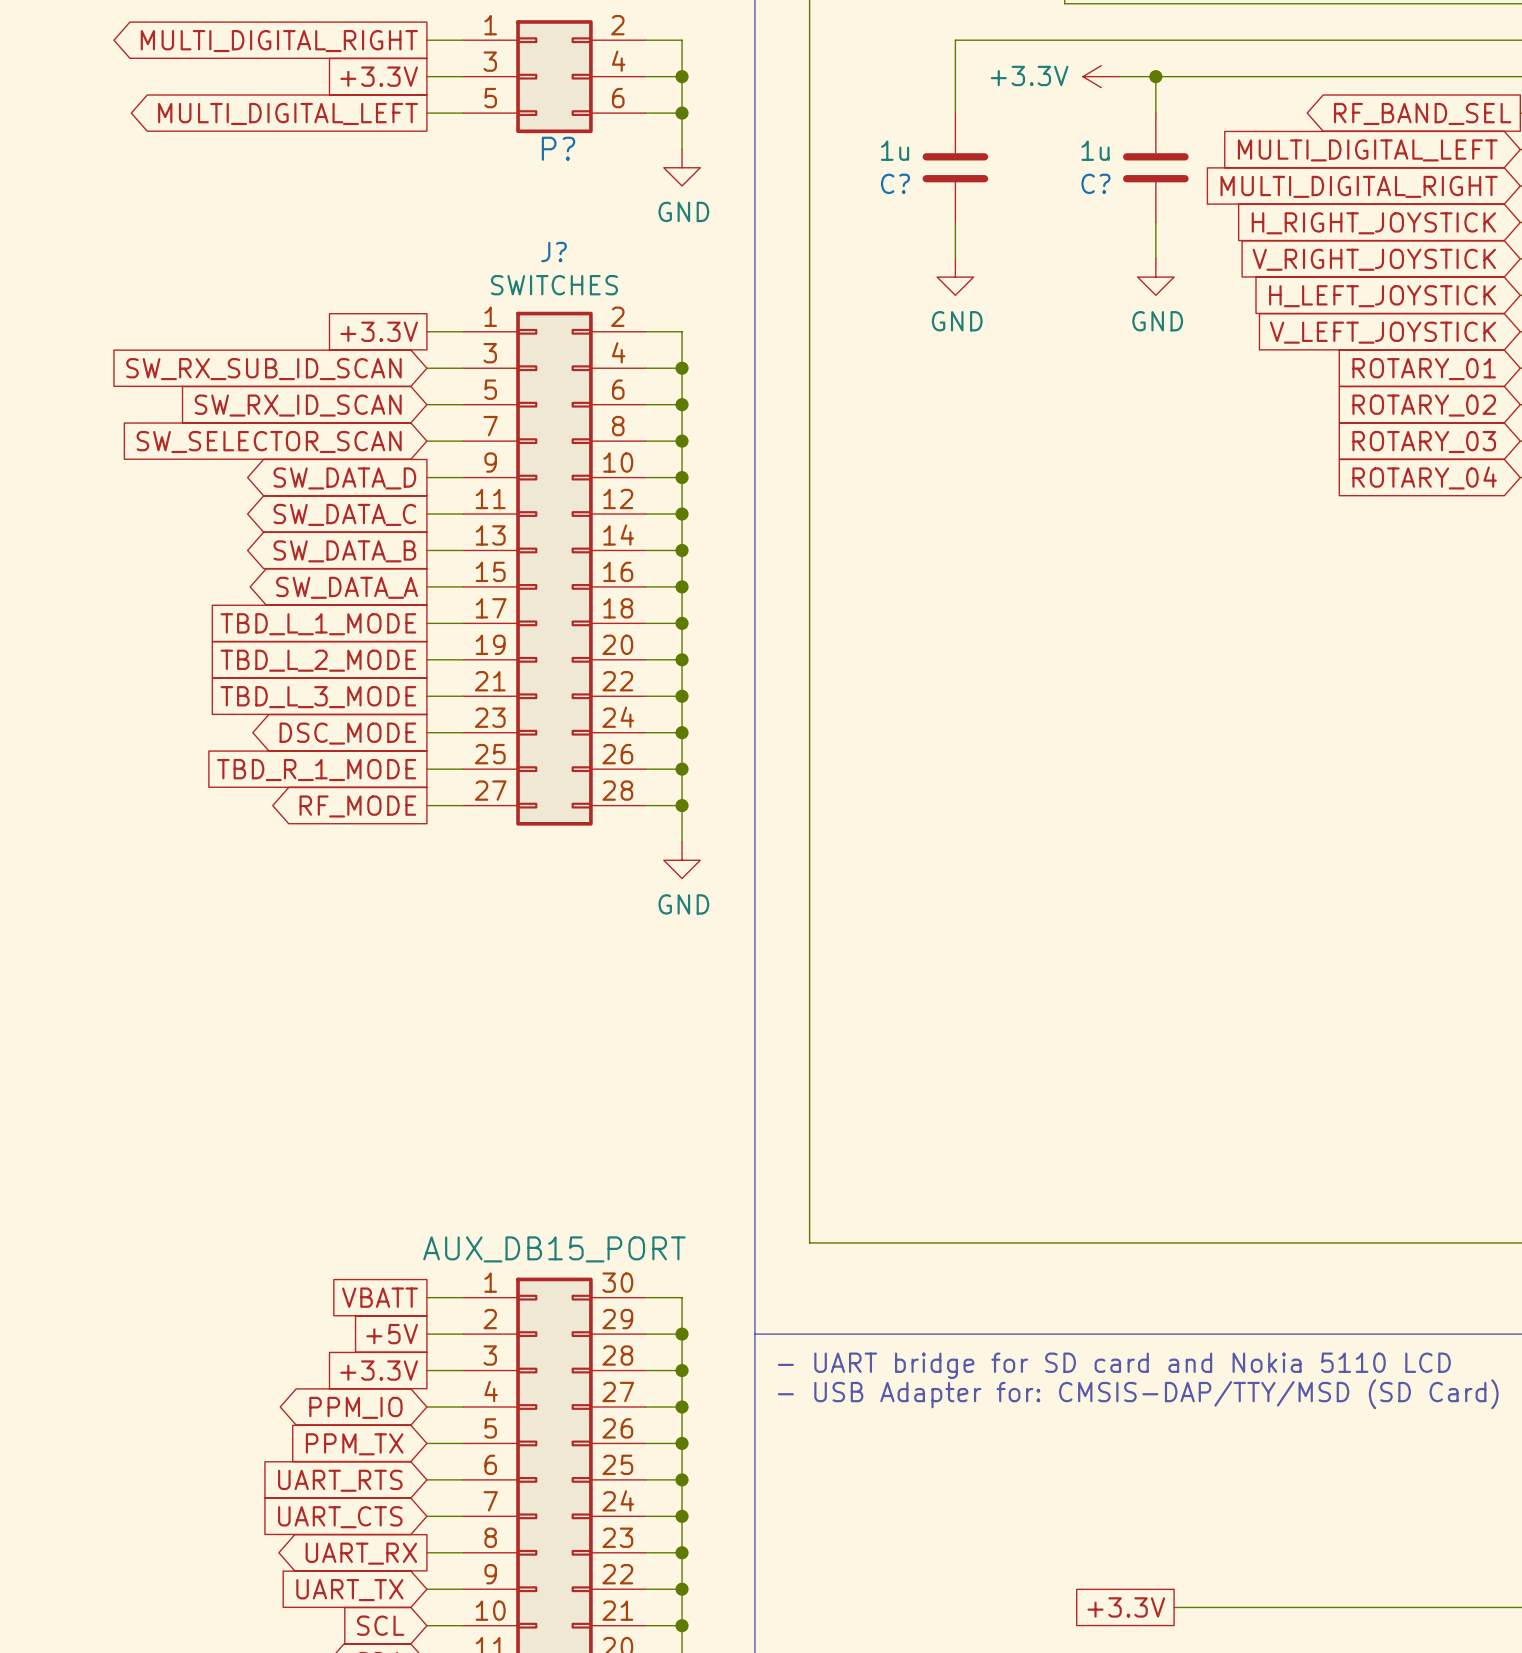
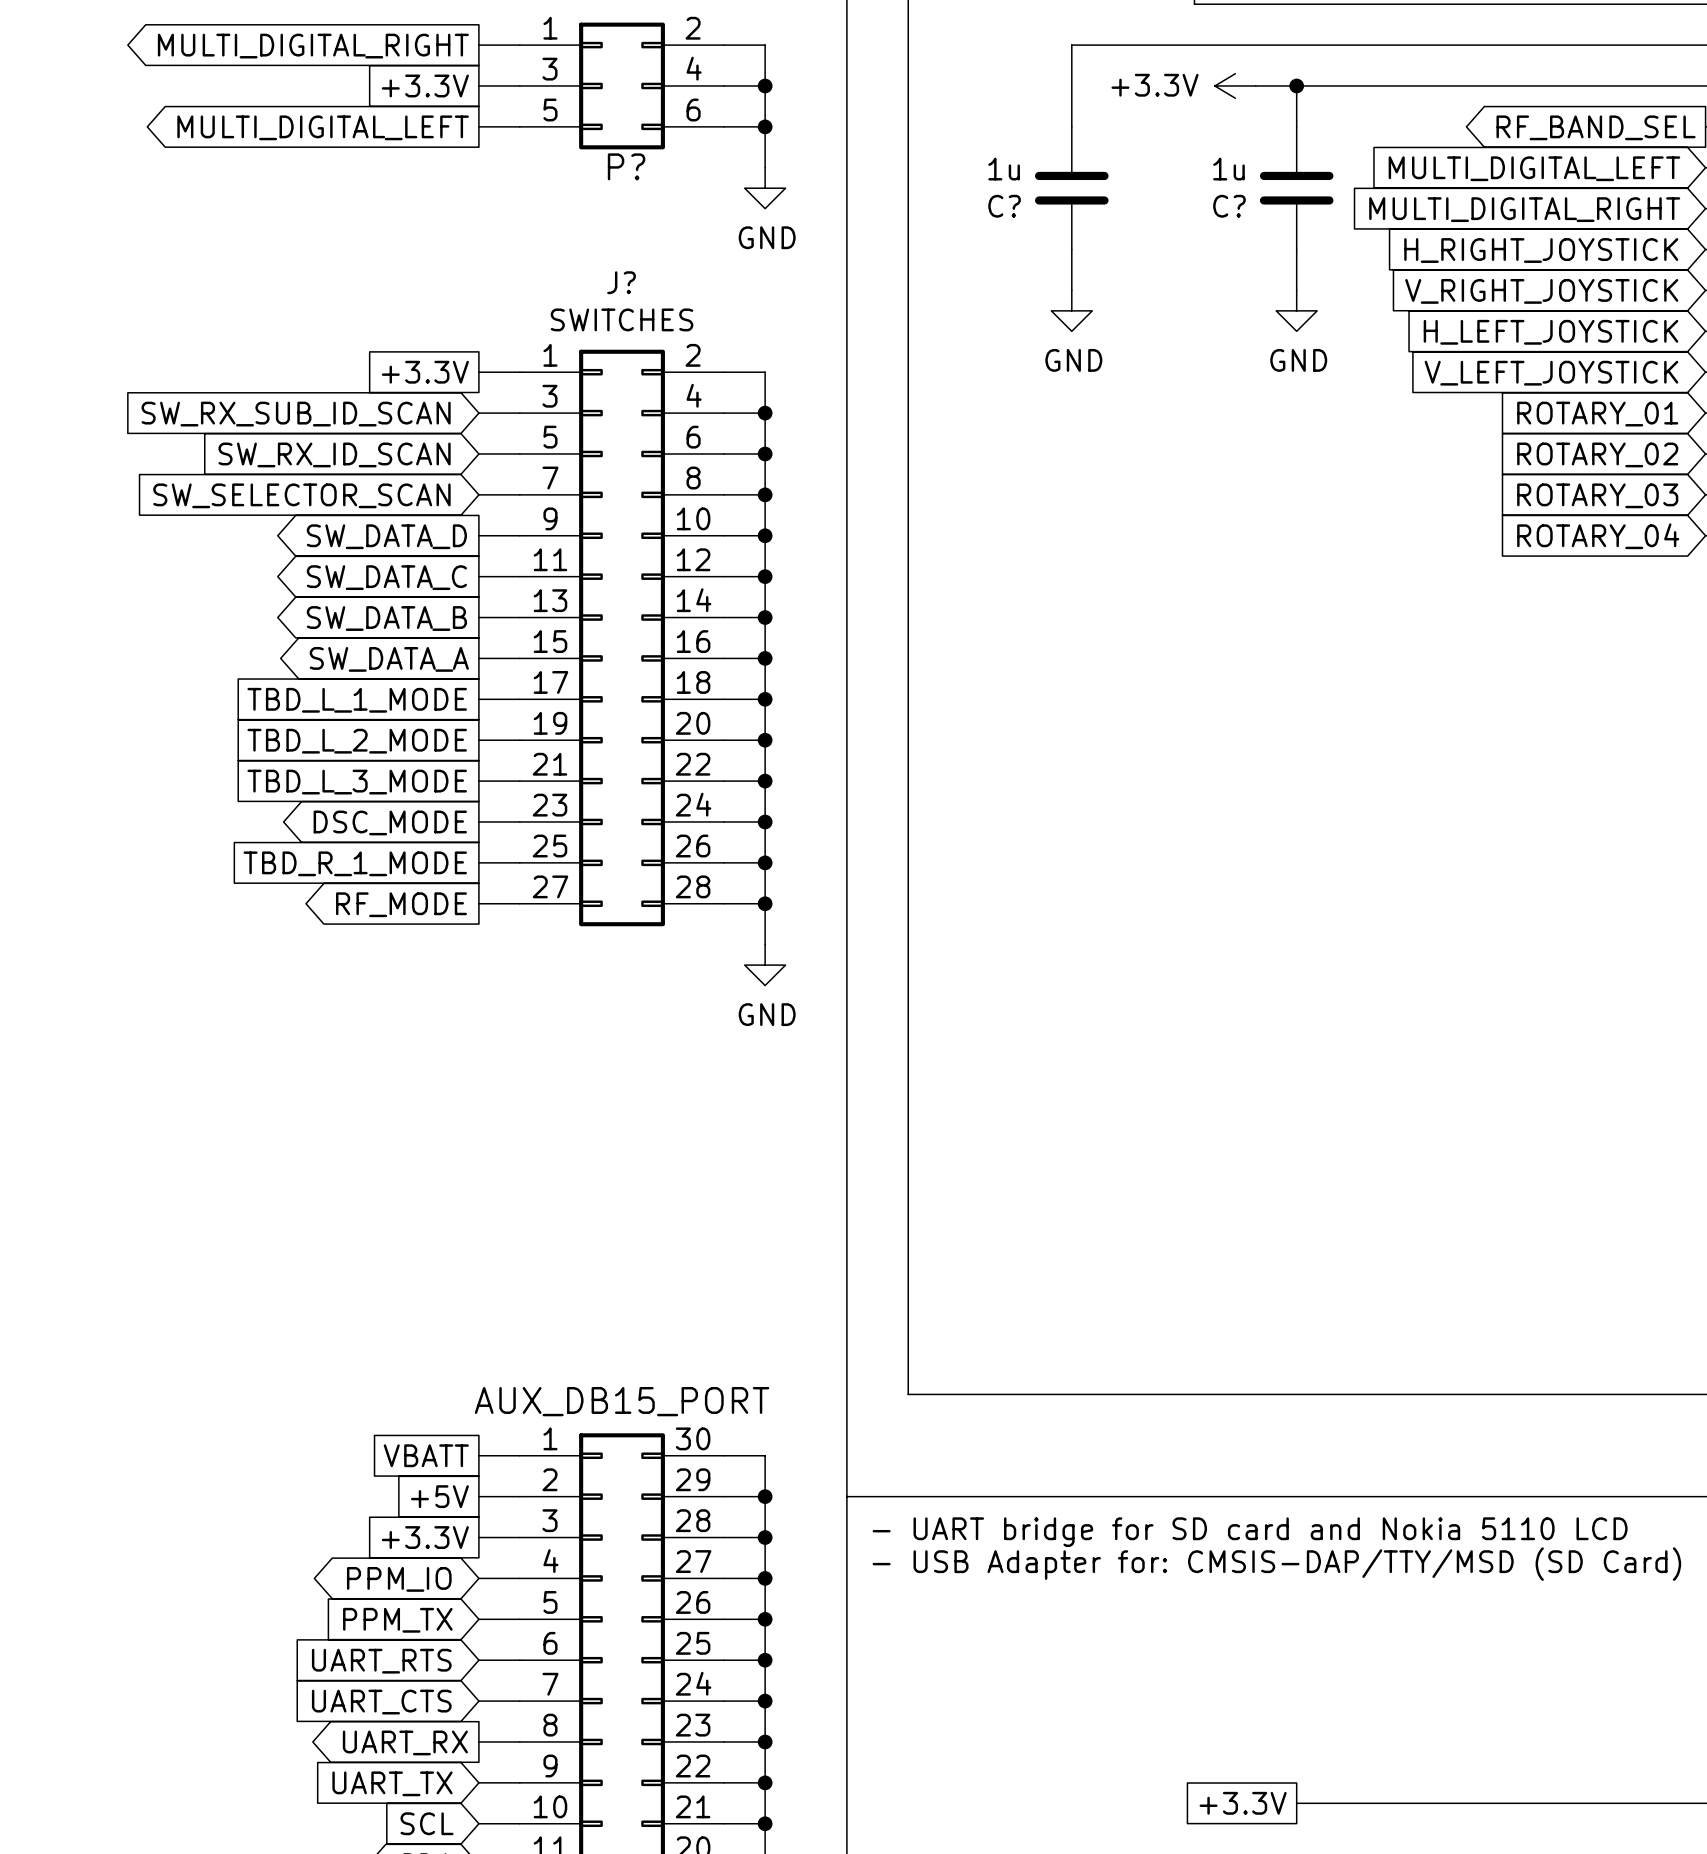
global label position: +3.3V (1126, 1607) -> +3.3V (1243, 1803)
wire: none -> (1296, 1803) (1317, 1803)

